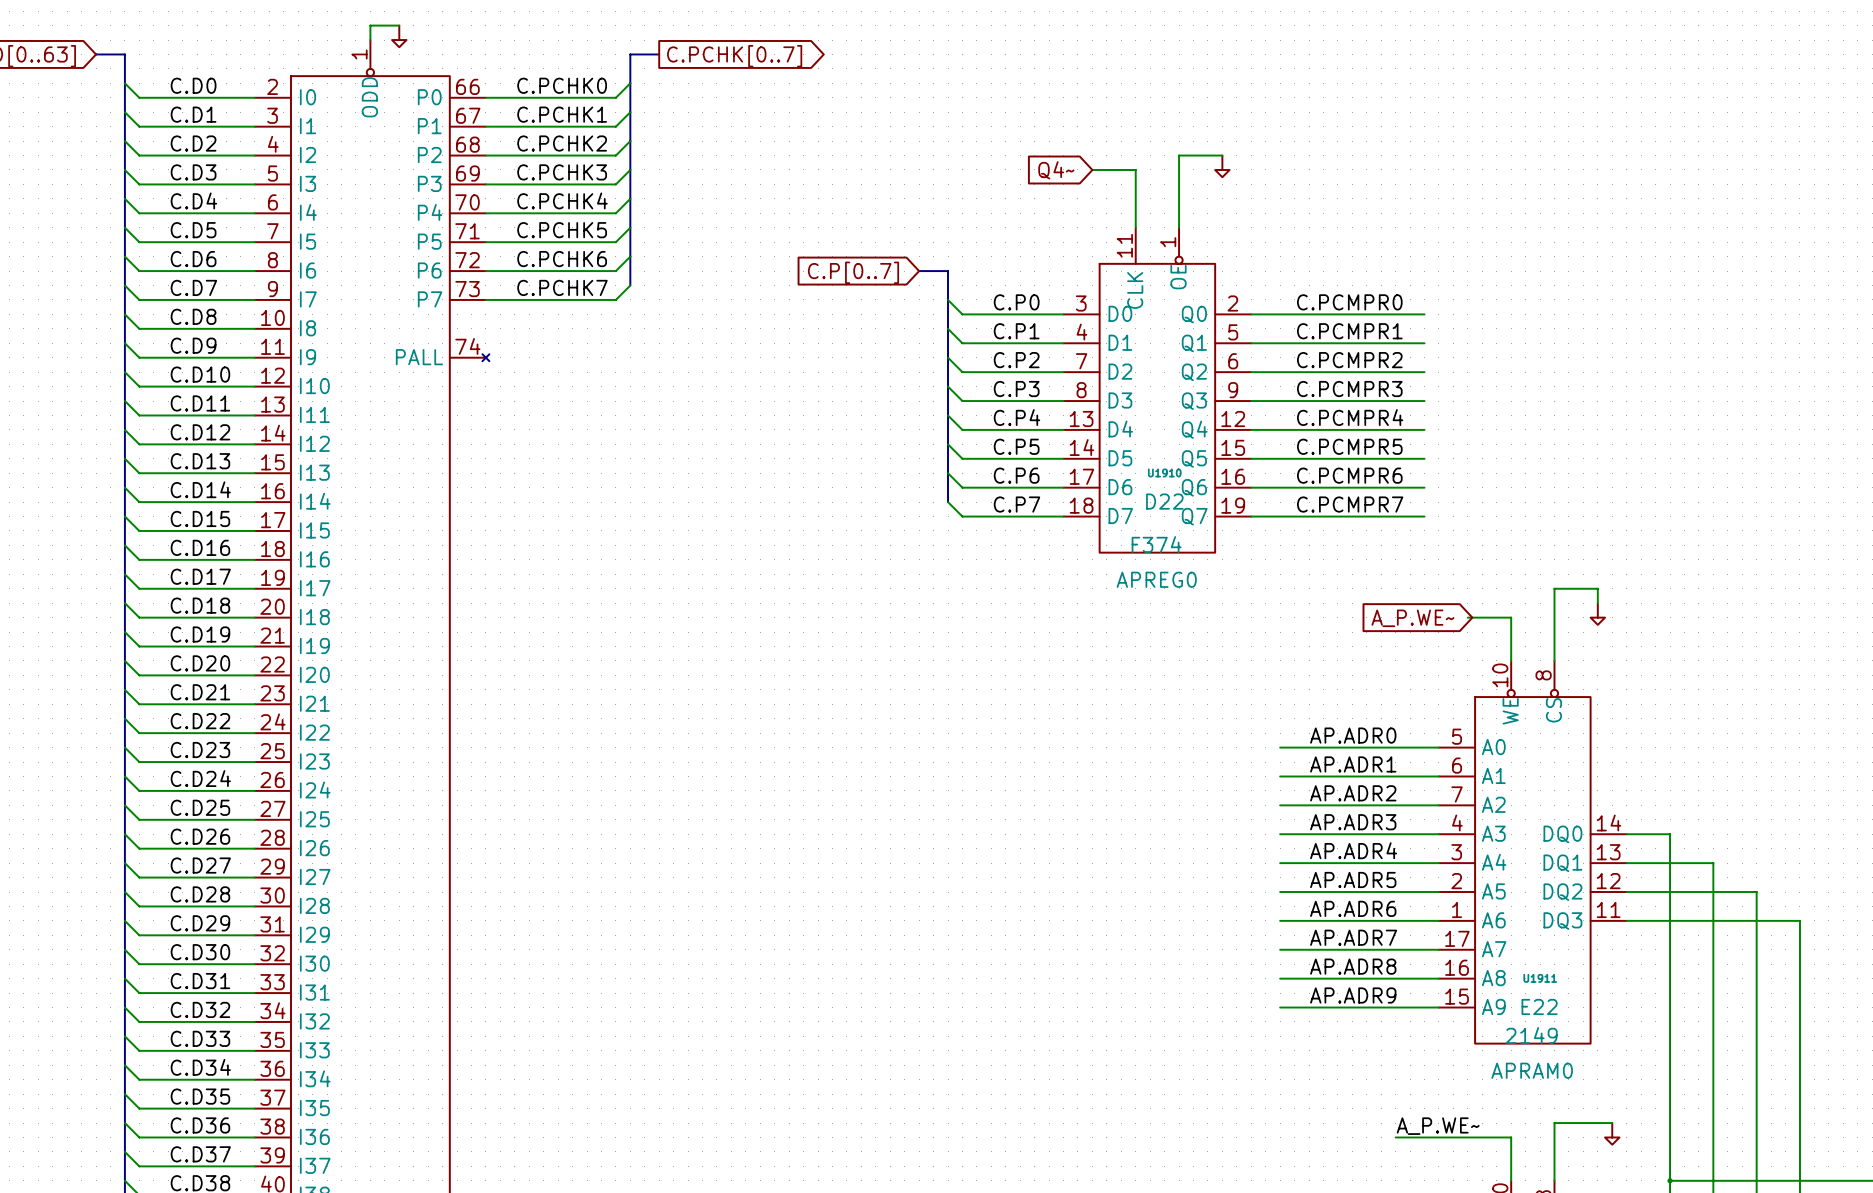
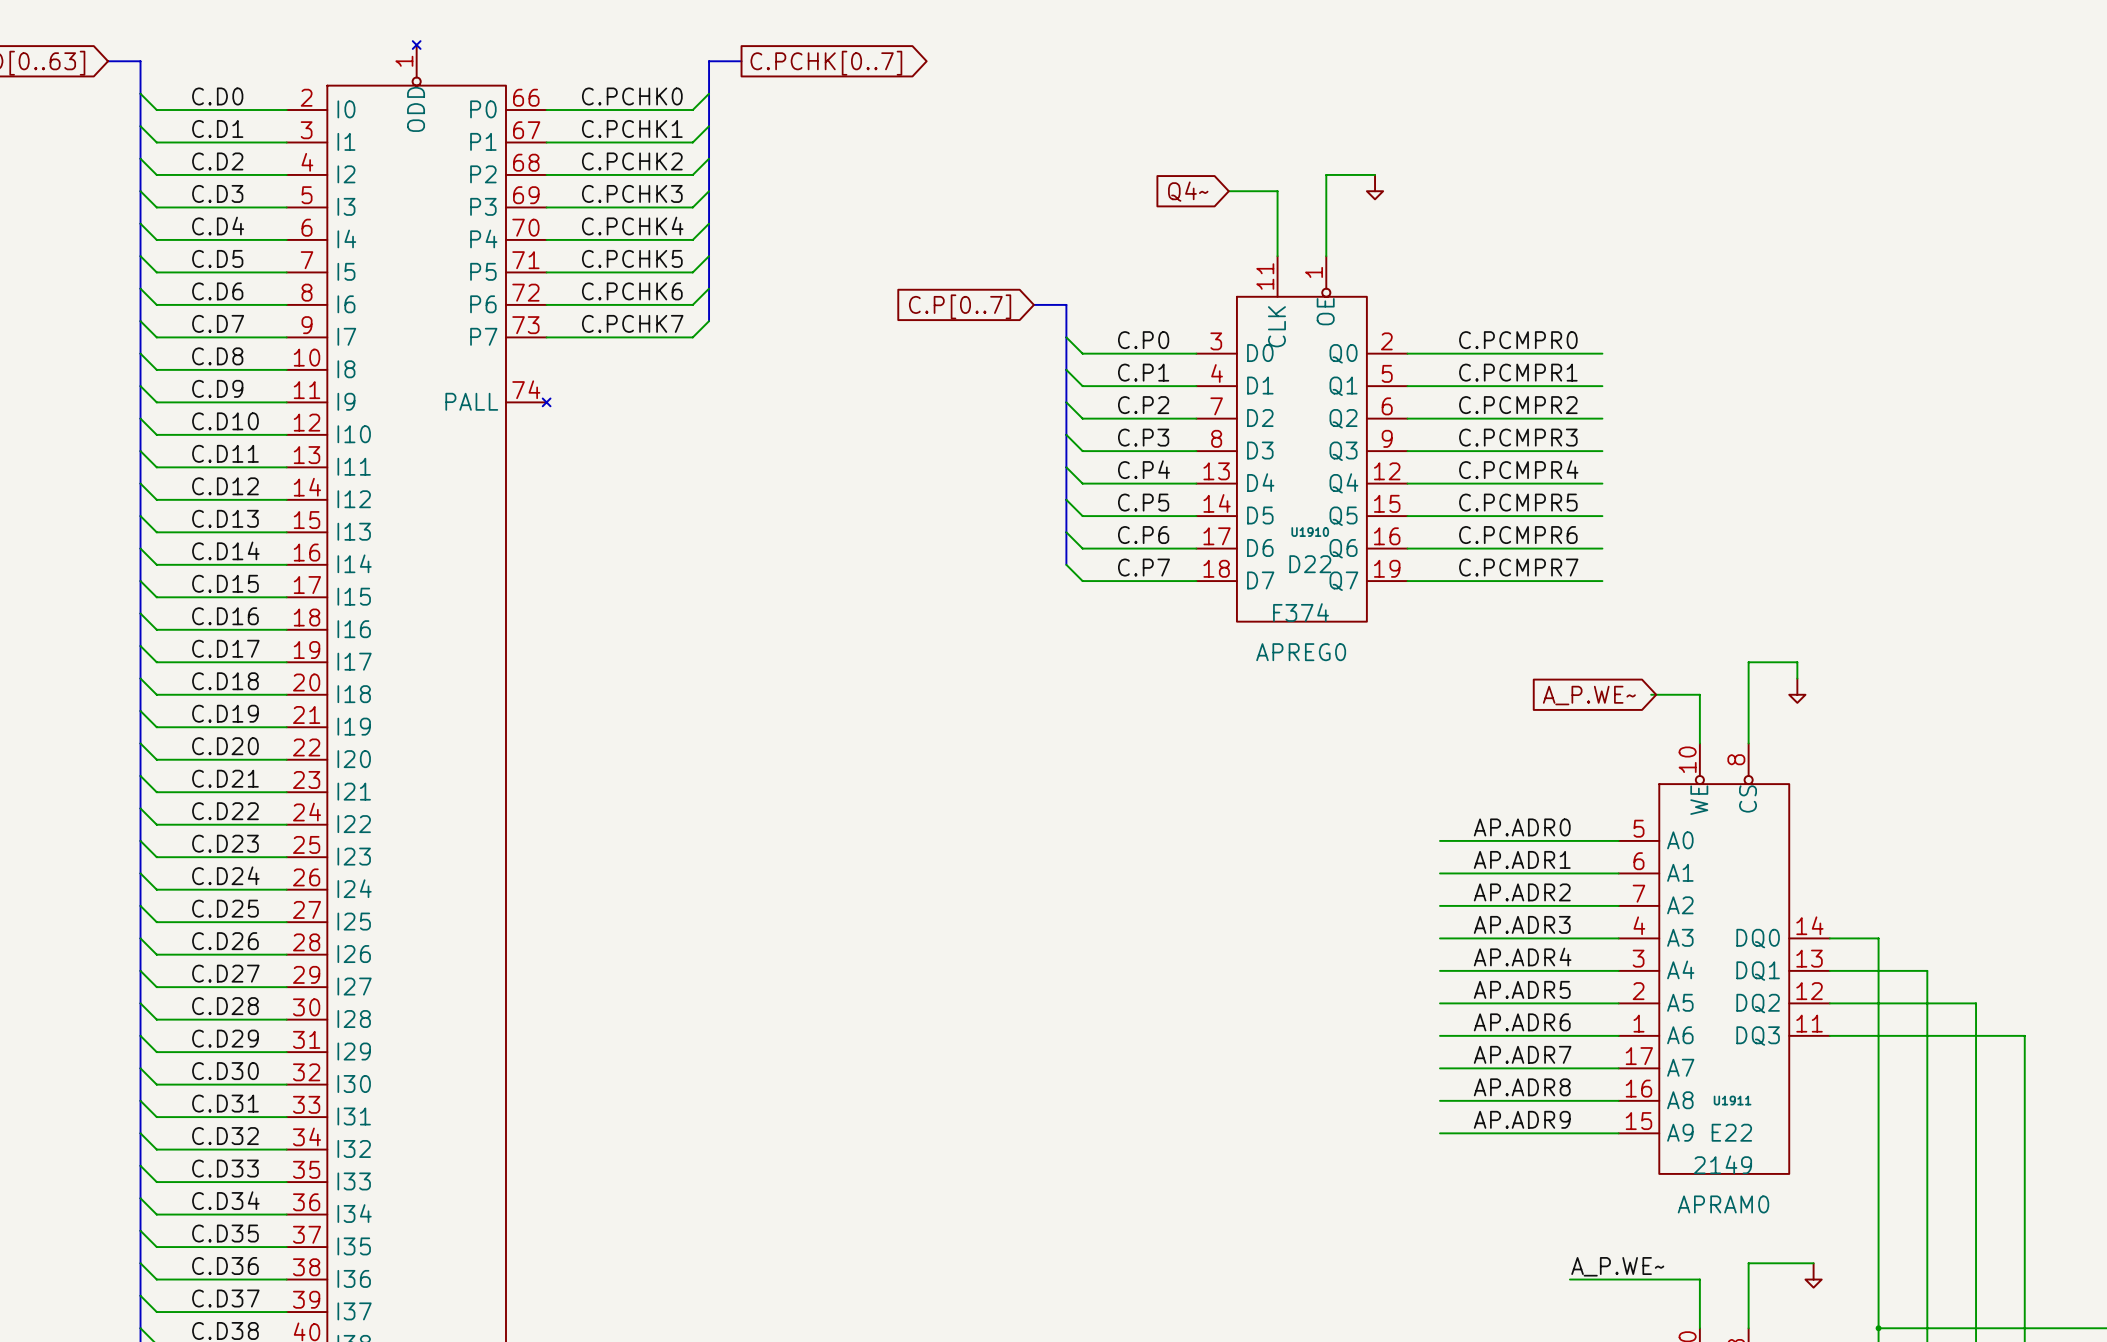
wire: (399, 25) (370, 25) (370, 40) -> none
power symbol: (399, 36) -> none
no-connect mark: none -> (416, 45)

